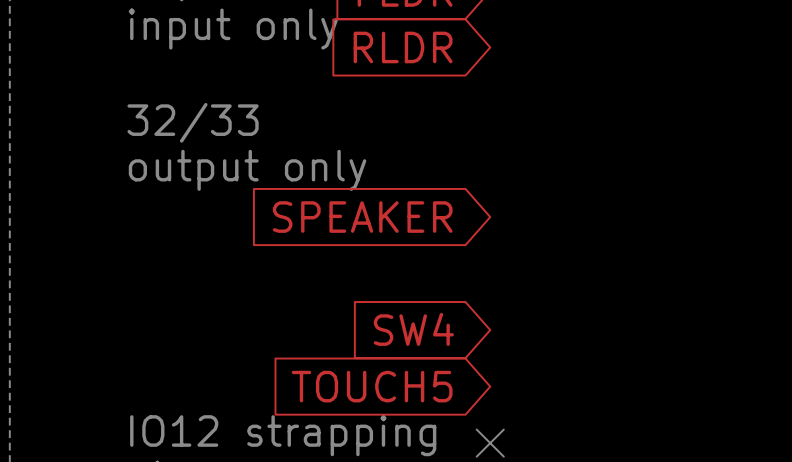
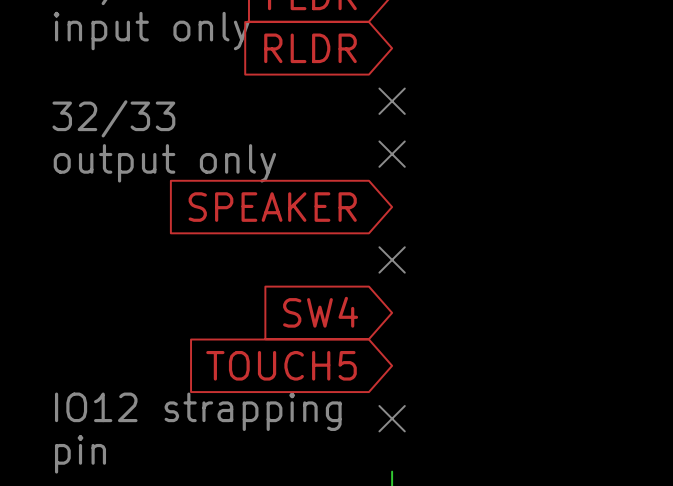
no-connect mark: none -> (392, 101)
no-connect mark: none -> (392, 154)
no-connect mark: none -> (392, 259)

